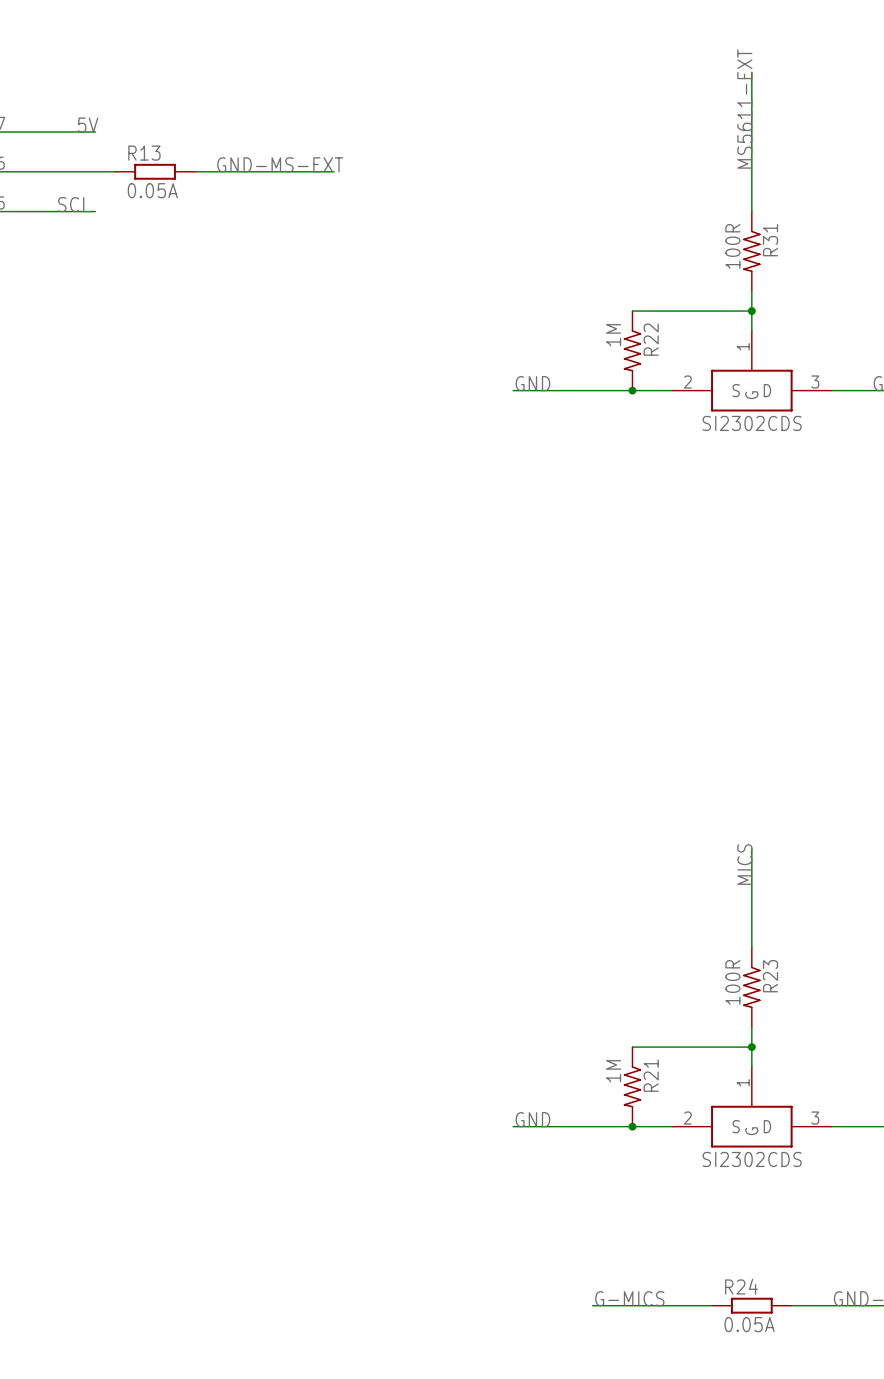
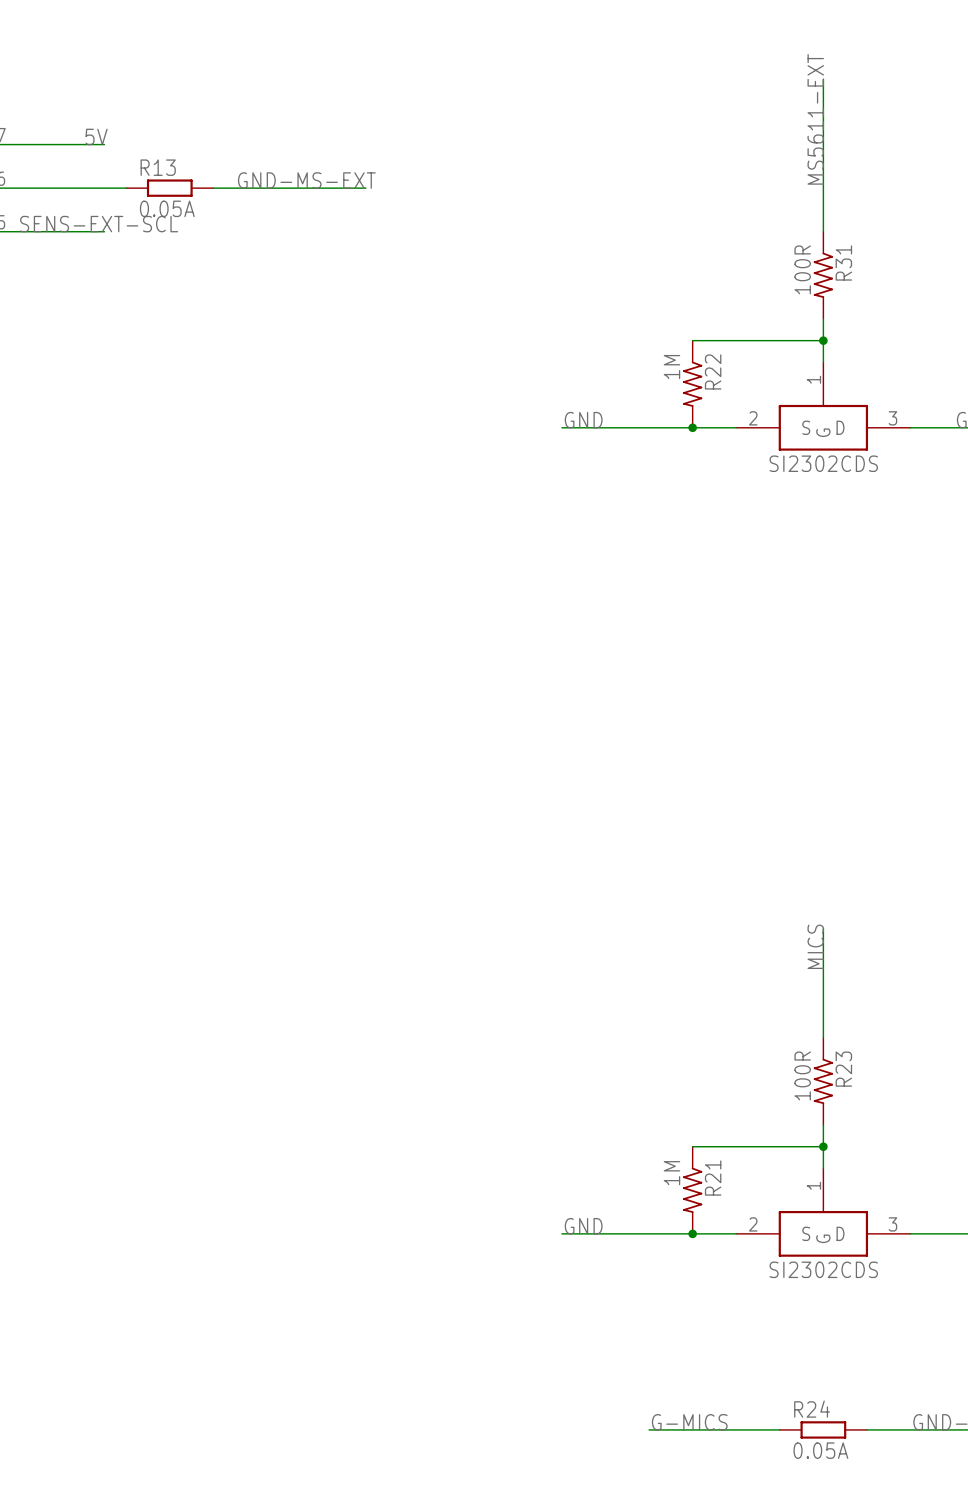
label: SCL (74, 204) -> none
label: none -> SENS-EXT-SCL (99, 224)

